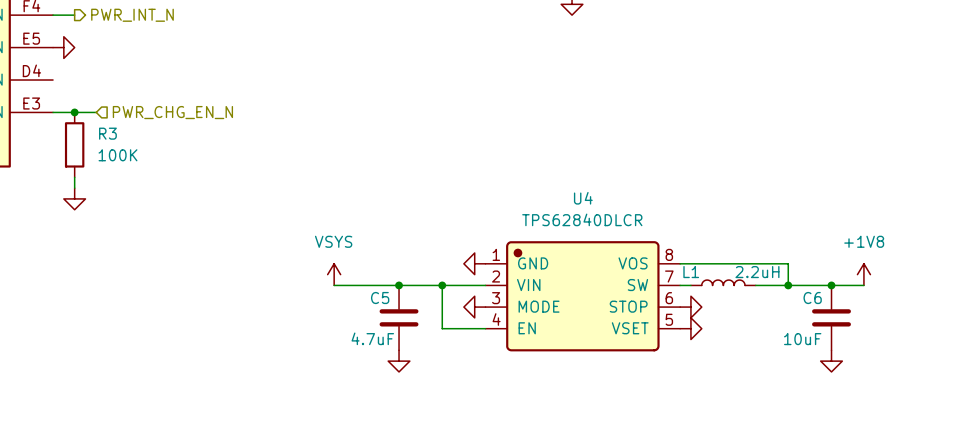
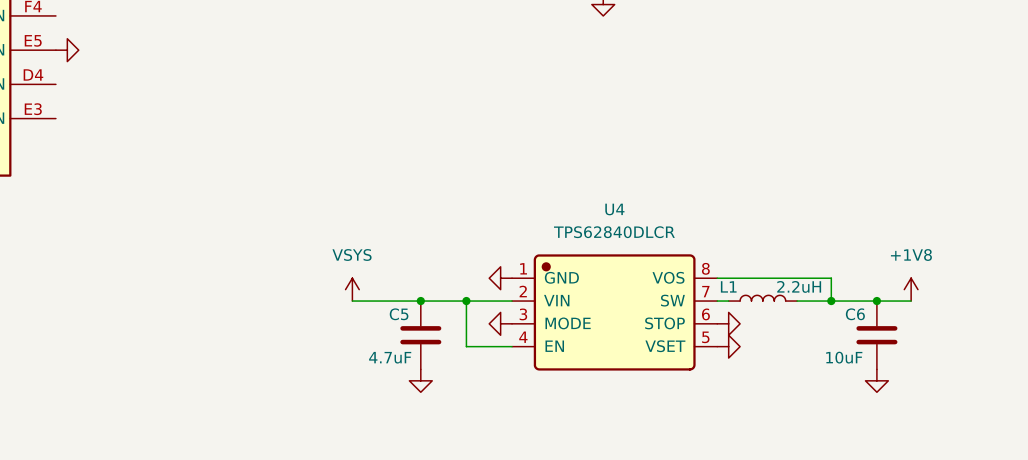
wire: (53, 15) (74, 15) -> none
hierarchical label: PWR_INT_N (132, 15) -> none
wire: (53, 112) (96, 112) -> none
junction: (74, 112) -> none
hierarchical label: PWR_CHG_EN_N (172, 112) -> none
R3: 100K (74, 144) -> none
wire: (74, 177) (74, 188) -> none
power symbol: (74, 198) -> none

